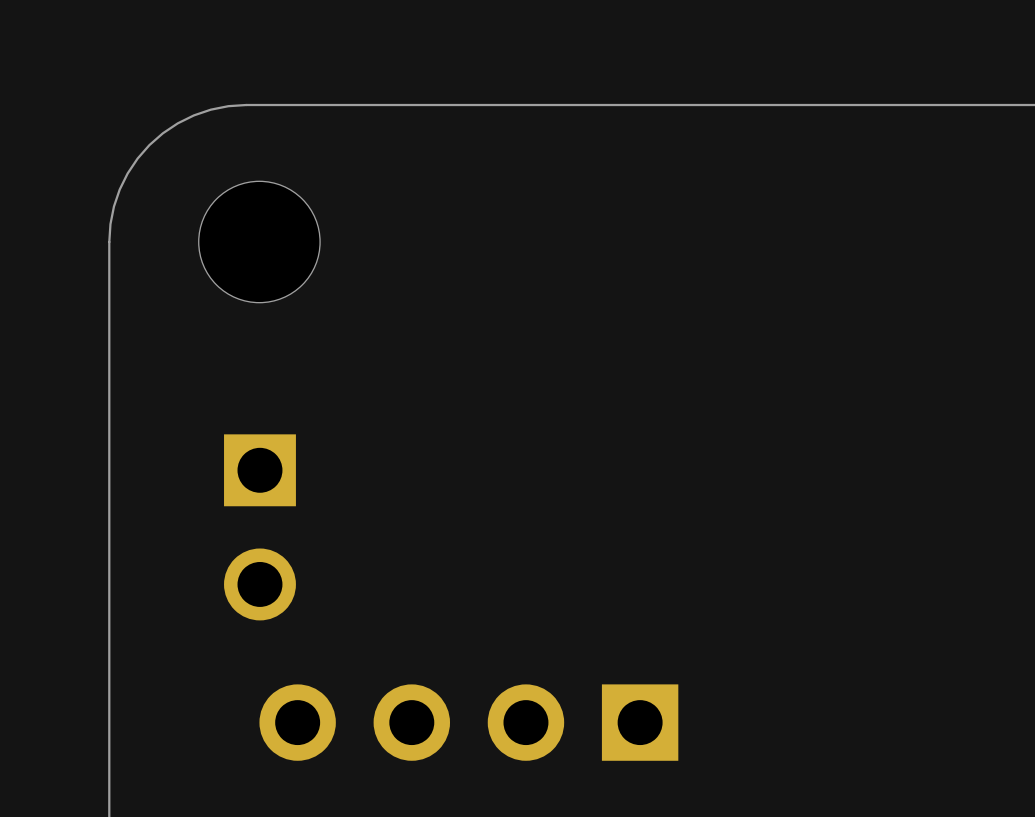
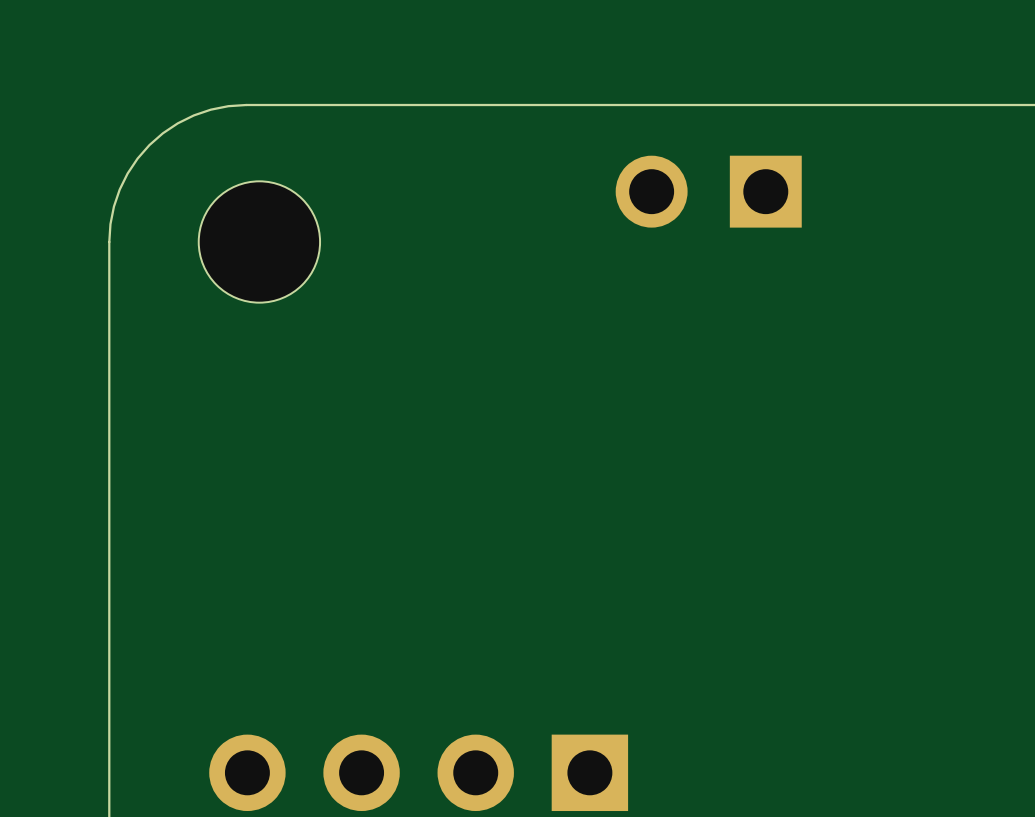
part rotation: 0° (259, 527) -> 90° clockwise (708, 191)
part position: (259, 527) -> (708, 191)
part position: (468, 722) -> (418, 772)

